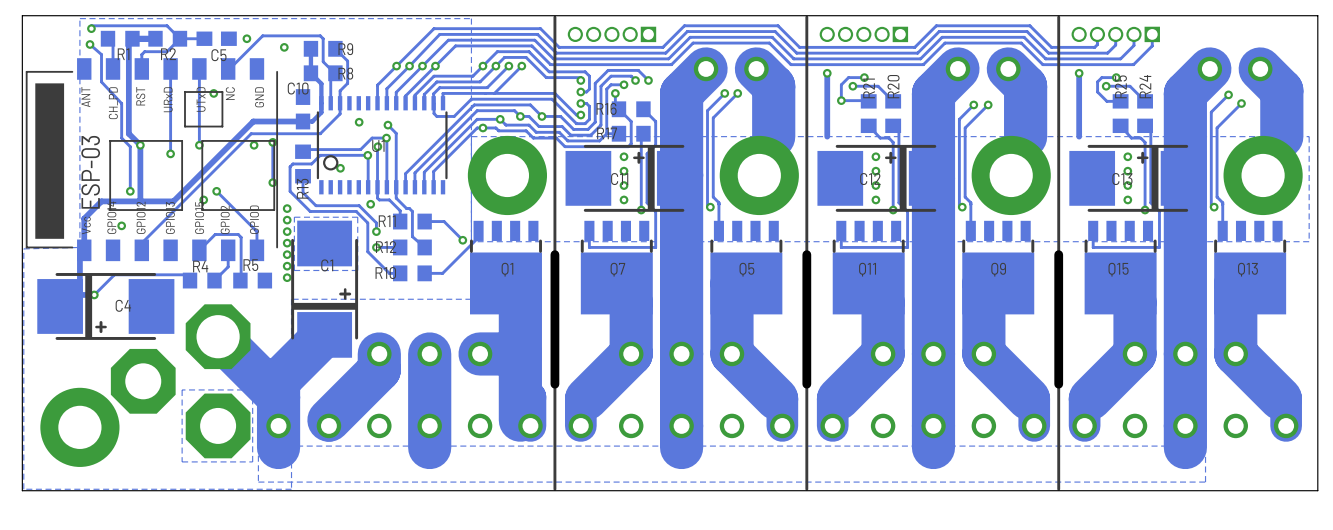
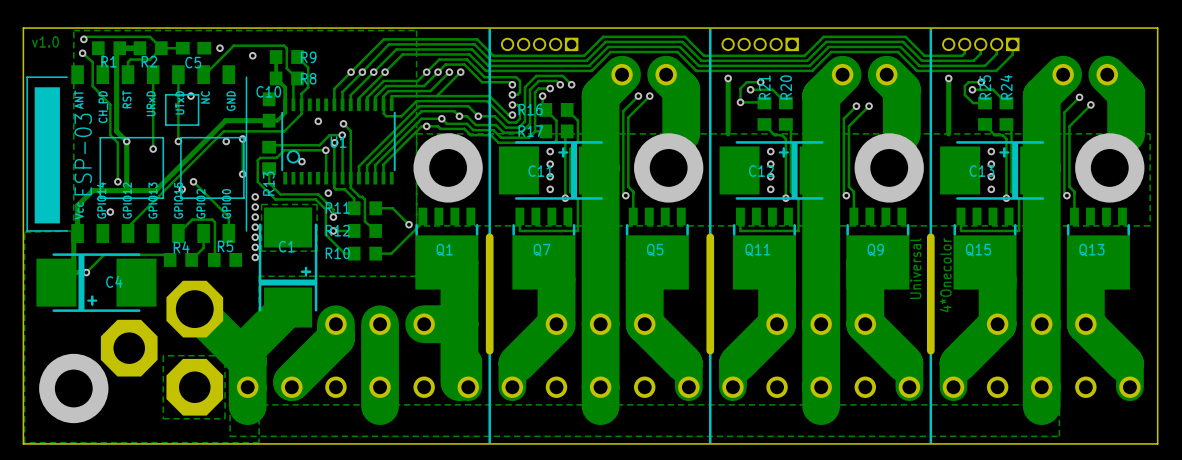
text: none -> v1.0 (45, 41)
text: none -> Universal (915, 268)
text: none -> 4*Onecolor (945, 275)

